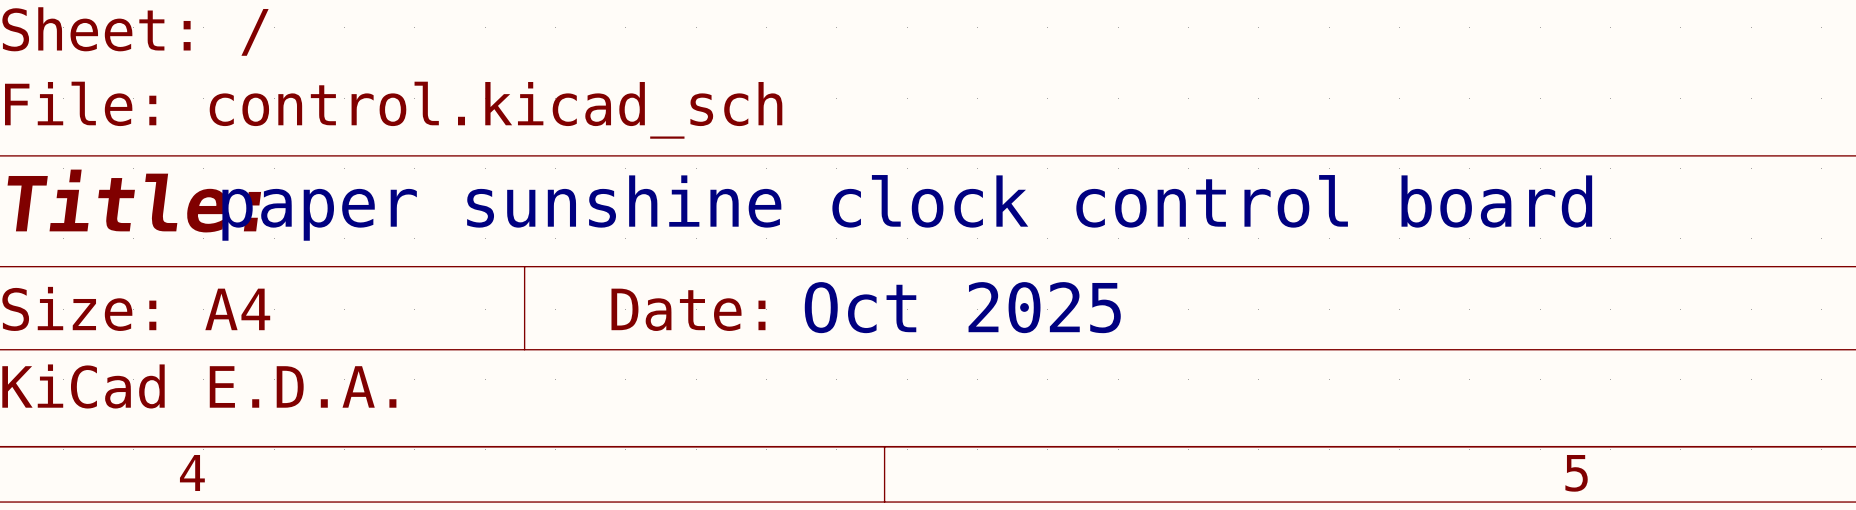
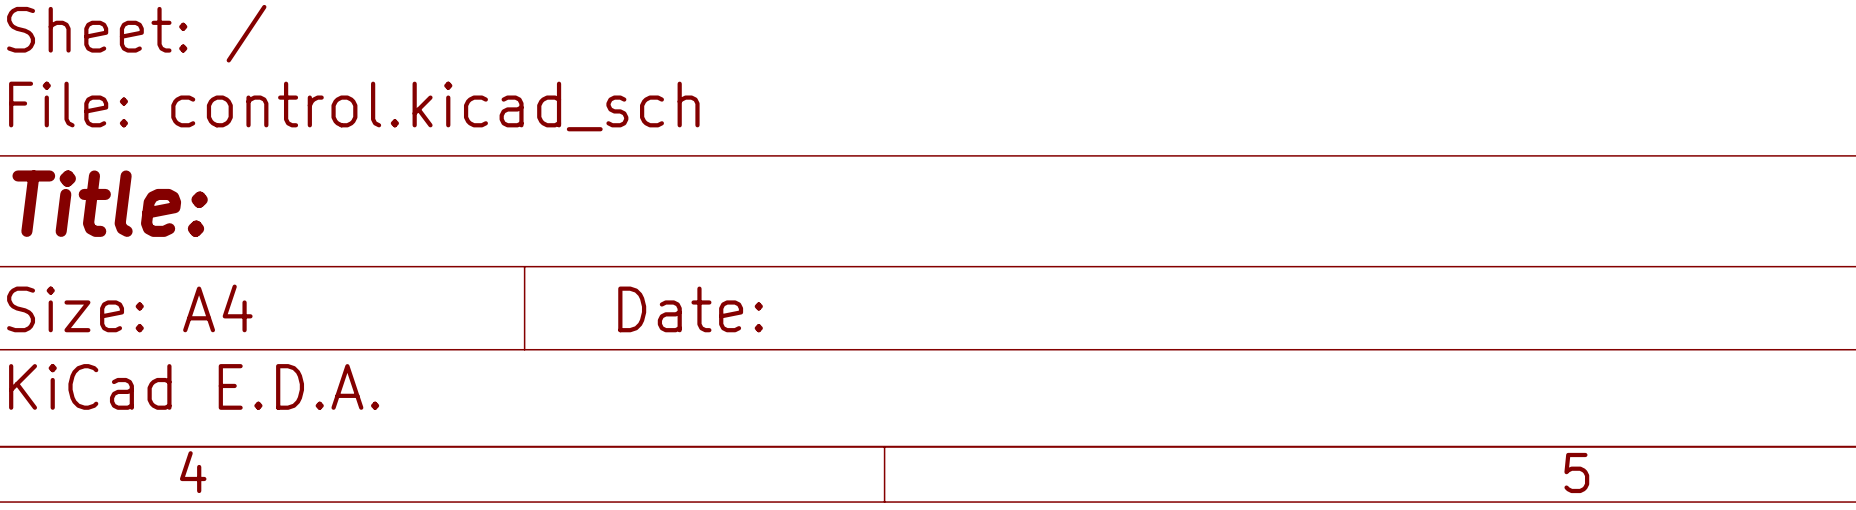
text: paper sunshine clock control board (907, 207) -> none
text: Oct 2025 (962, 307) -> none

